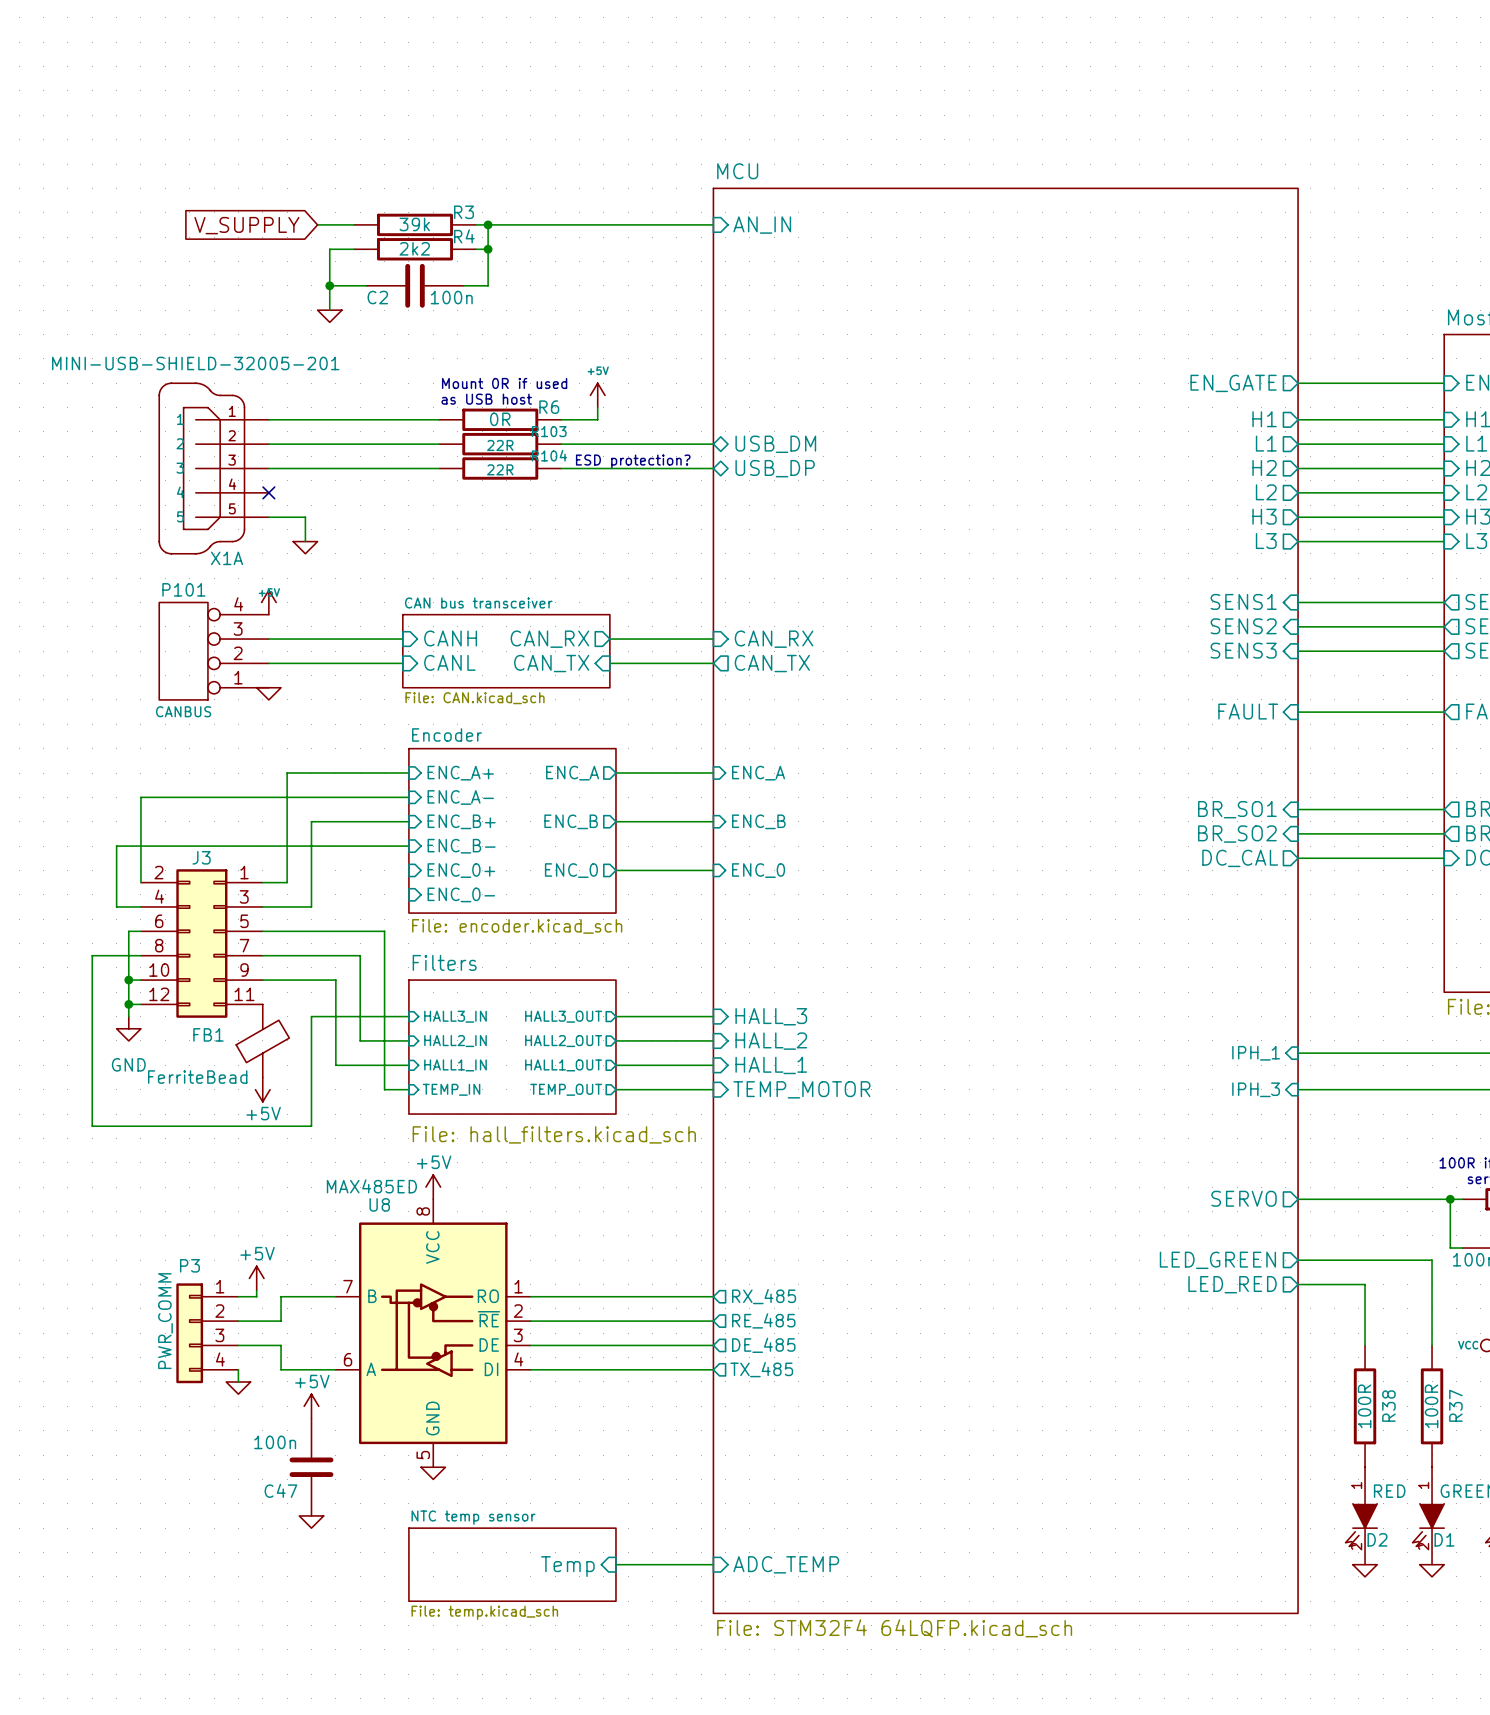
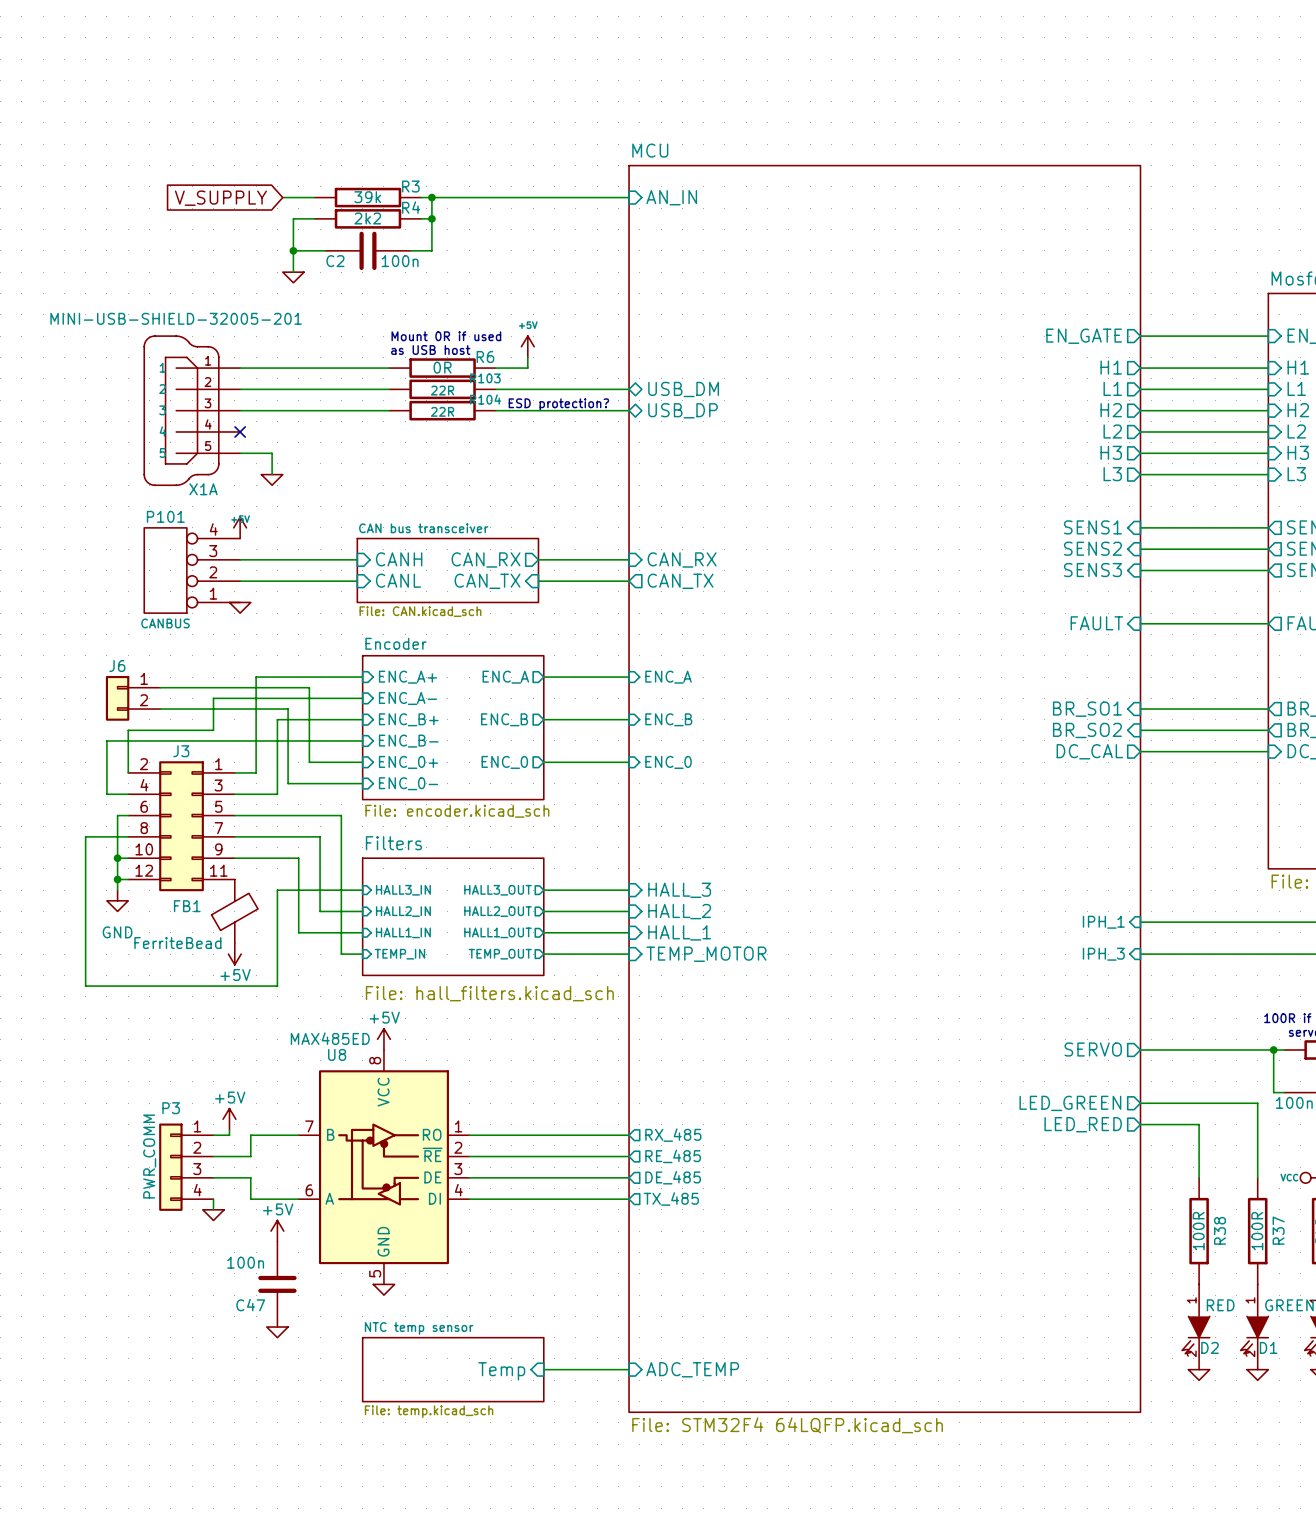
wire: none -> (160, 687) (309, 687) (309, 762) (362, 762)
J6: none -> (133, 698)
wire: (238, 797) (140, 797) (140, 833) -> (213, 698) (213, 730) (128, 730)
wire: none -> (160, 709) (288, 709) (288, 783) (362, 783)

